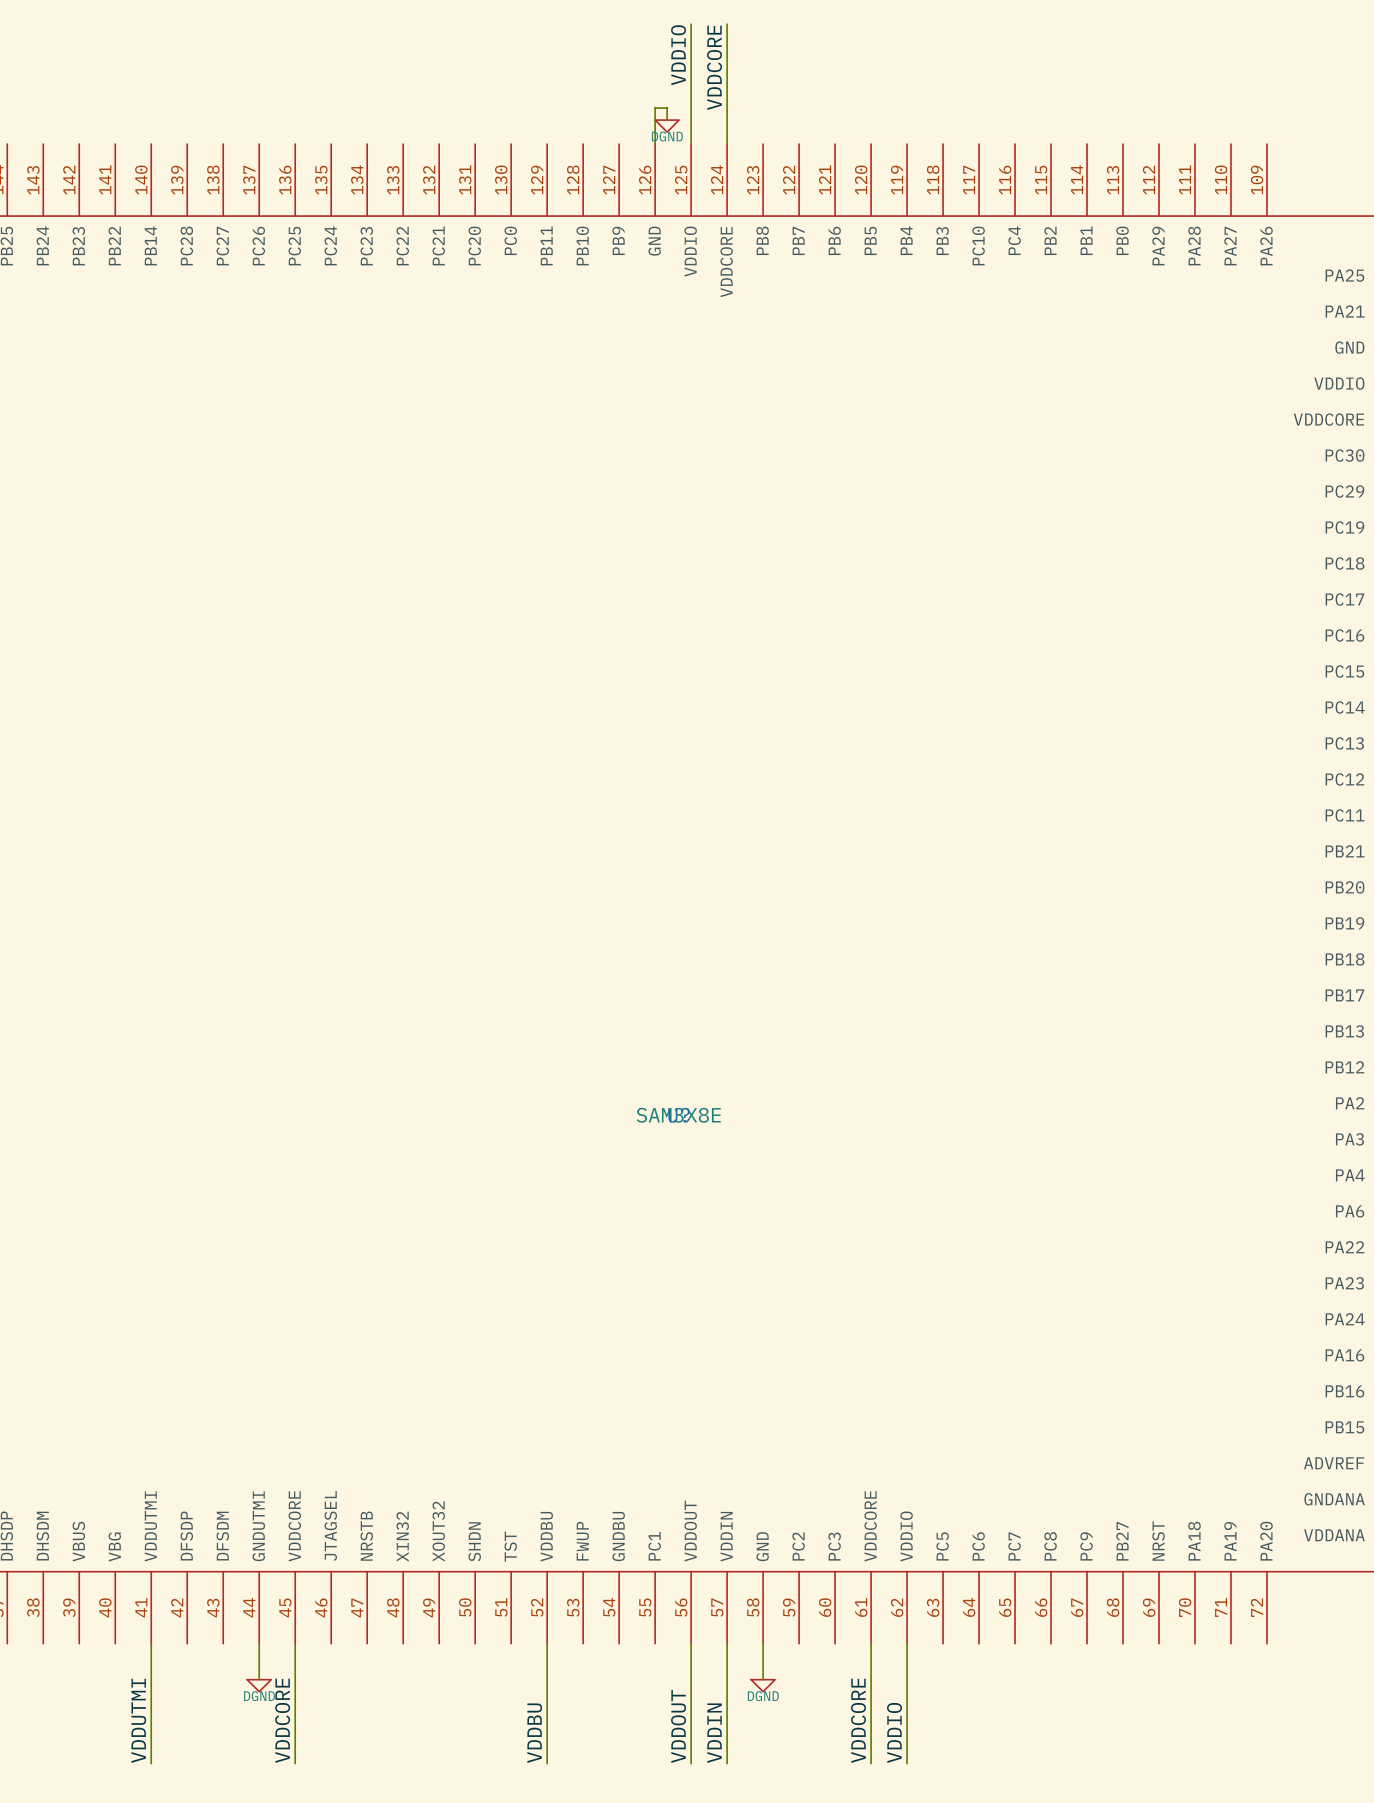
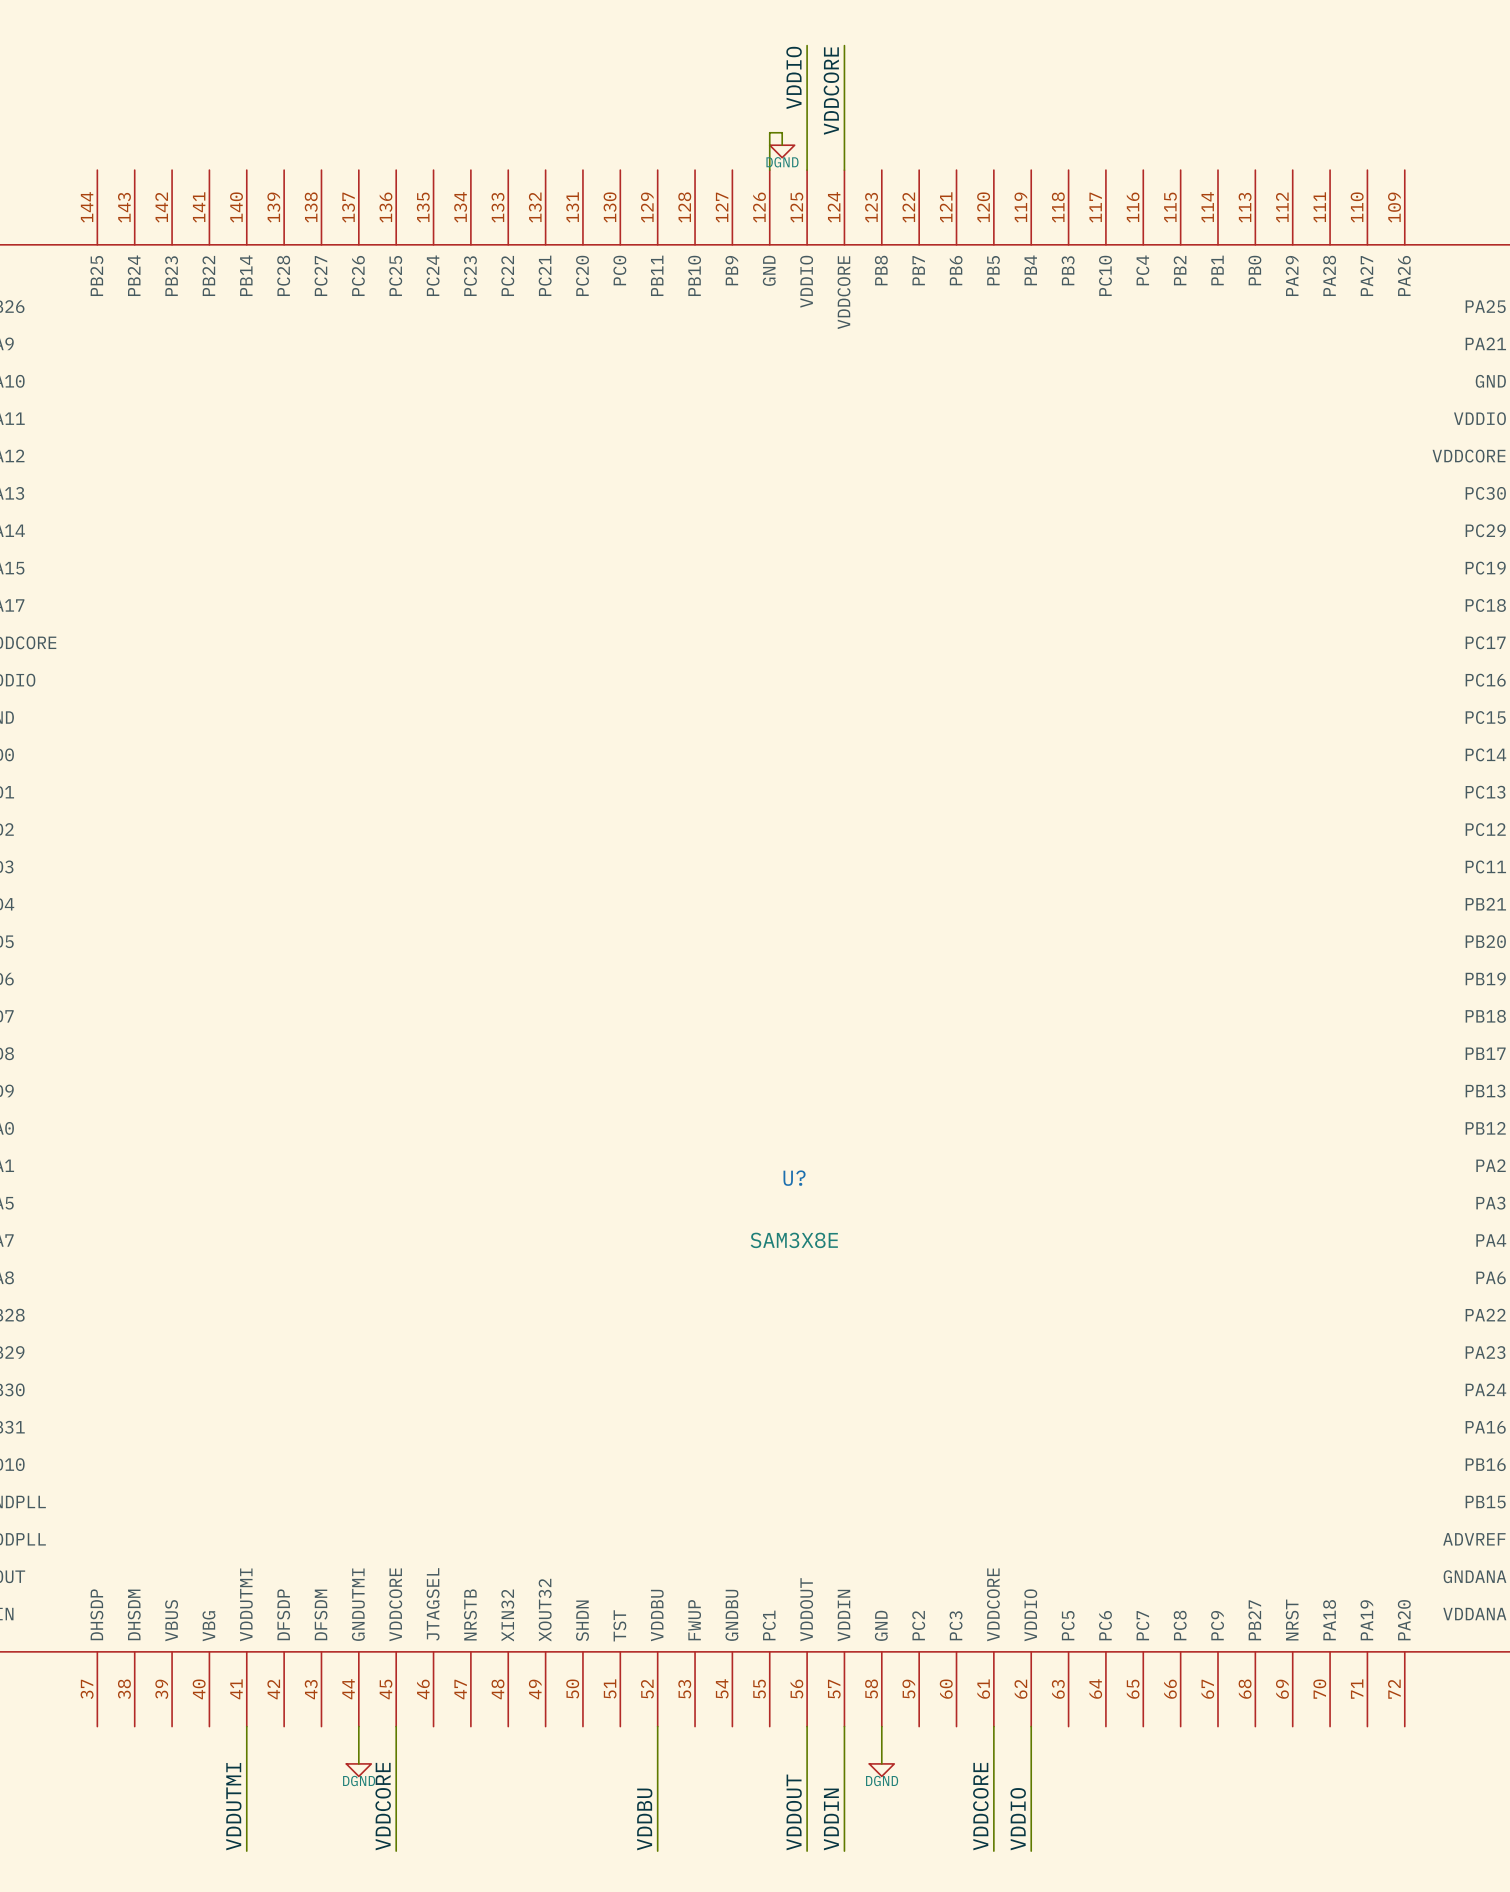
U? value position: SAM3X8E (678, 1115) -> SAM3X8E (794, 1240)

